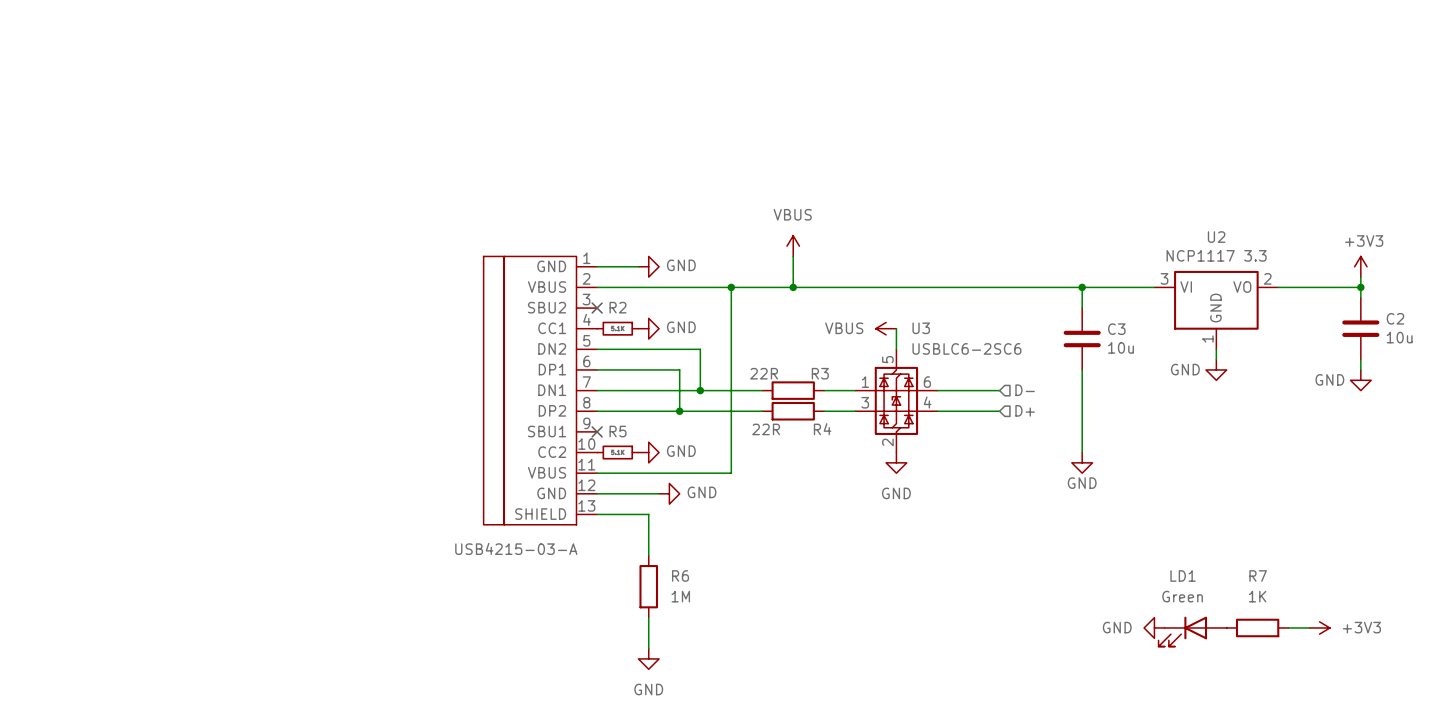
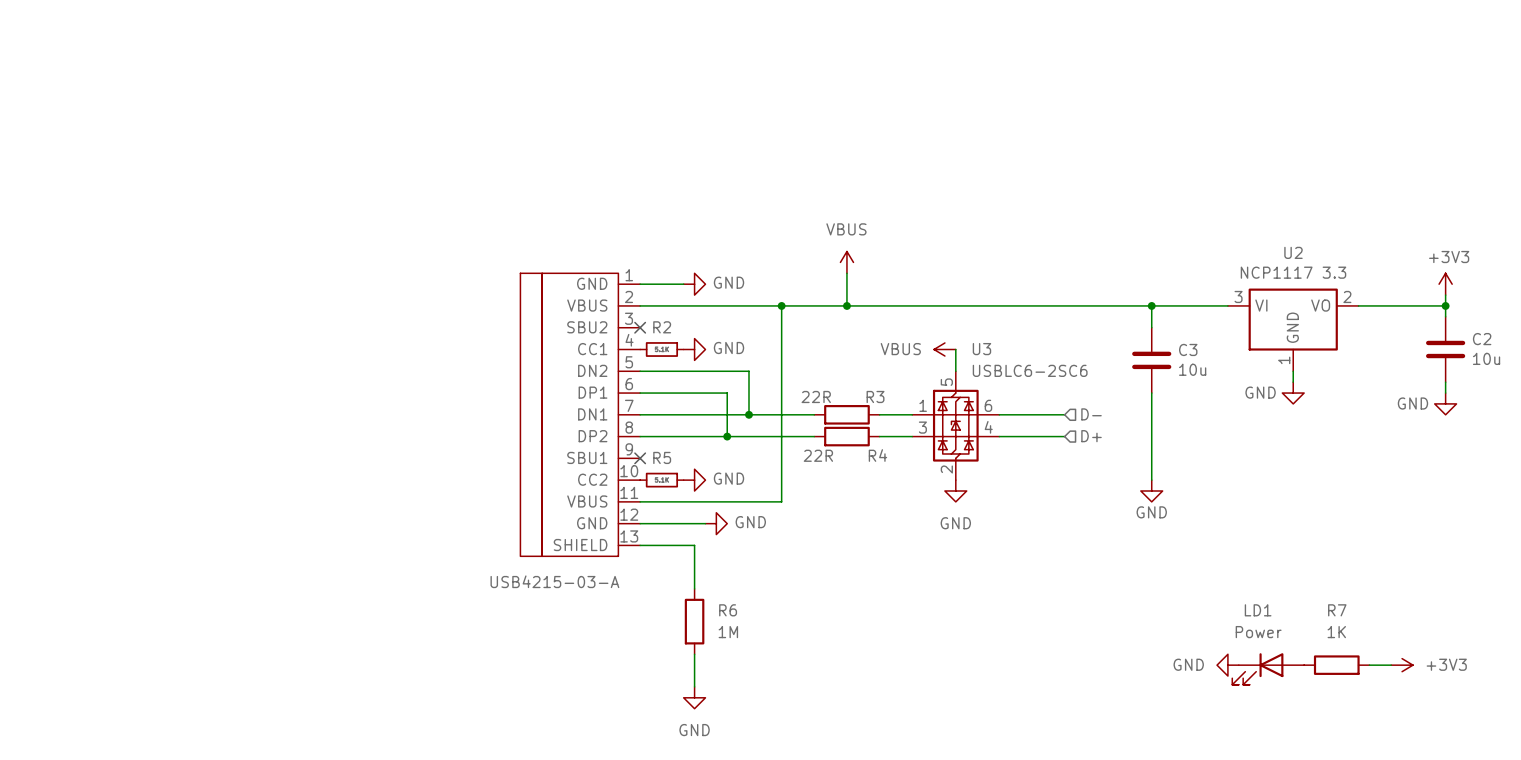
LD1 value: Green (1182, 596) -> Power (1258, 632)

